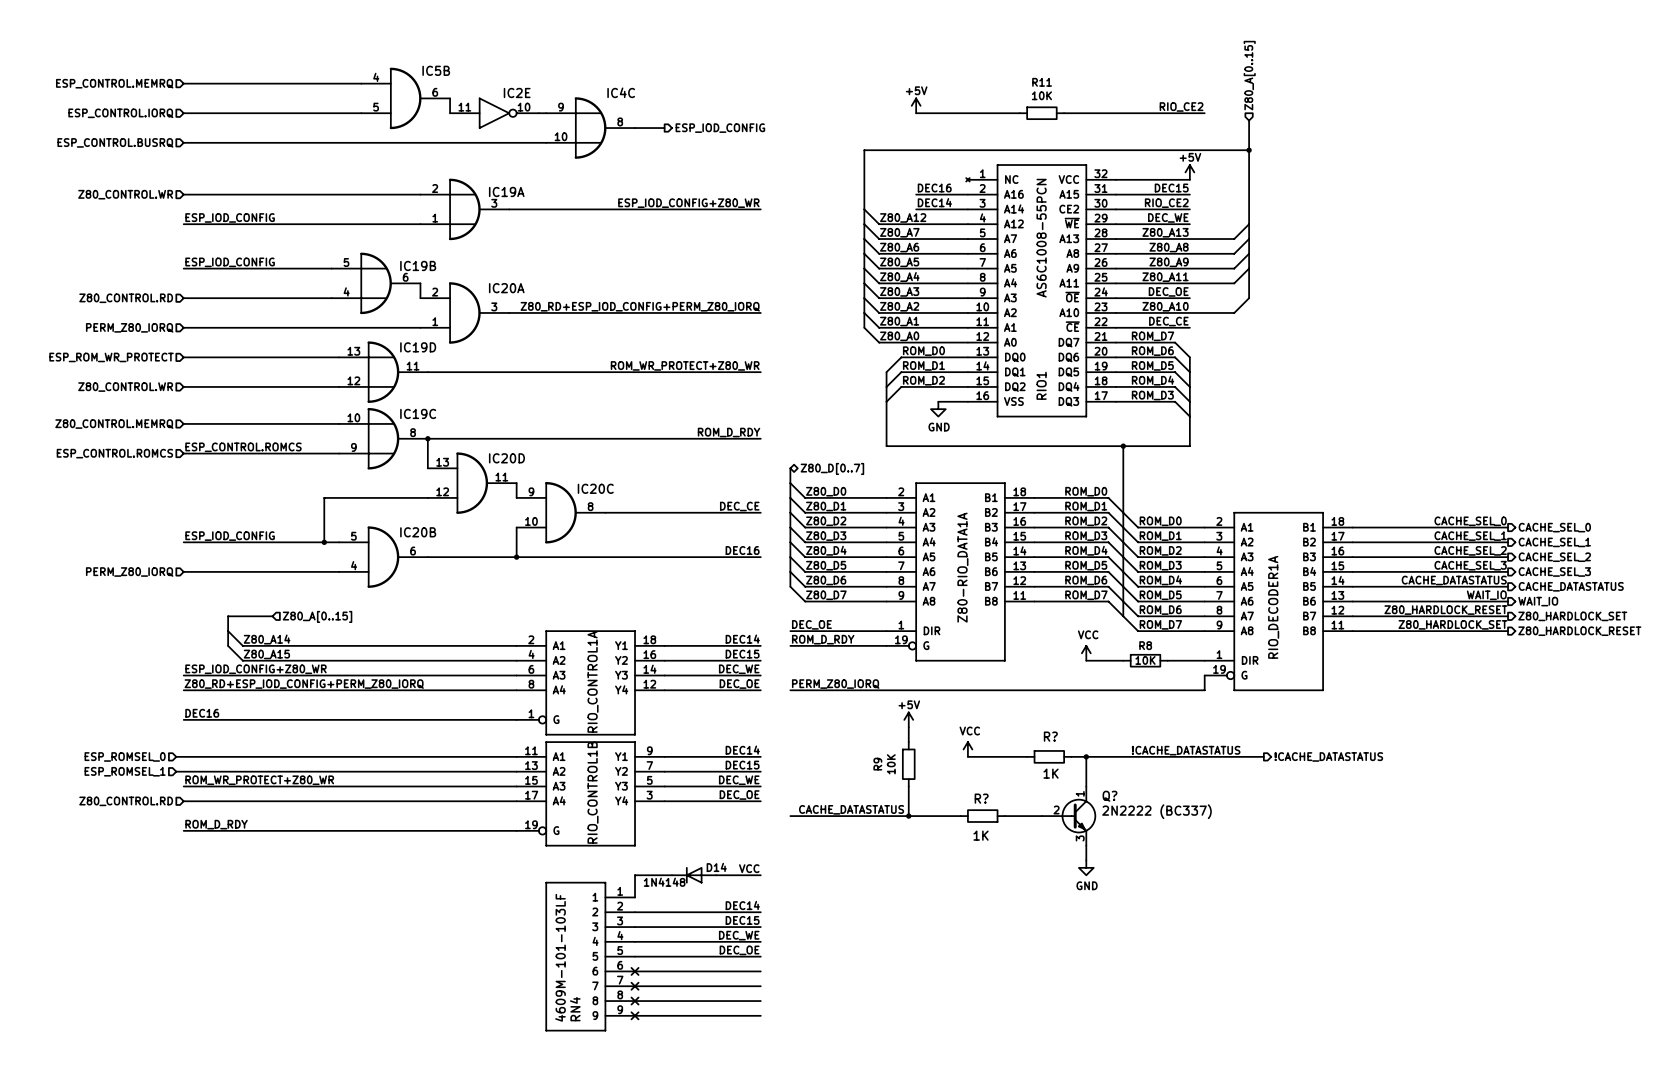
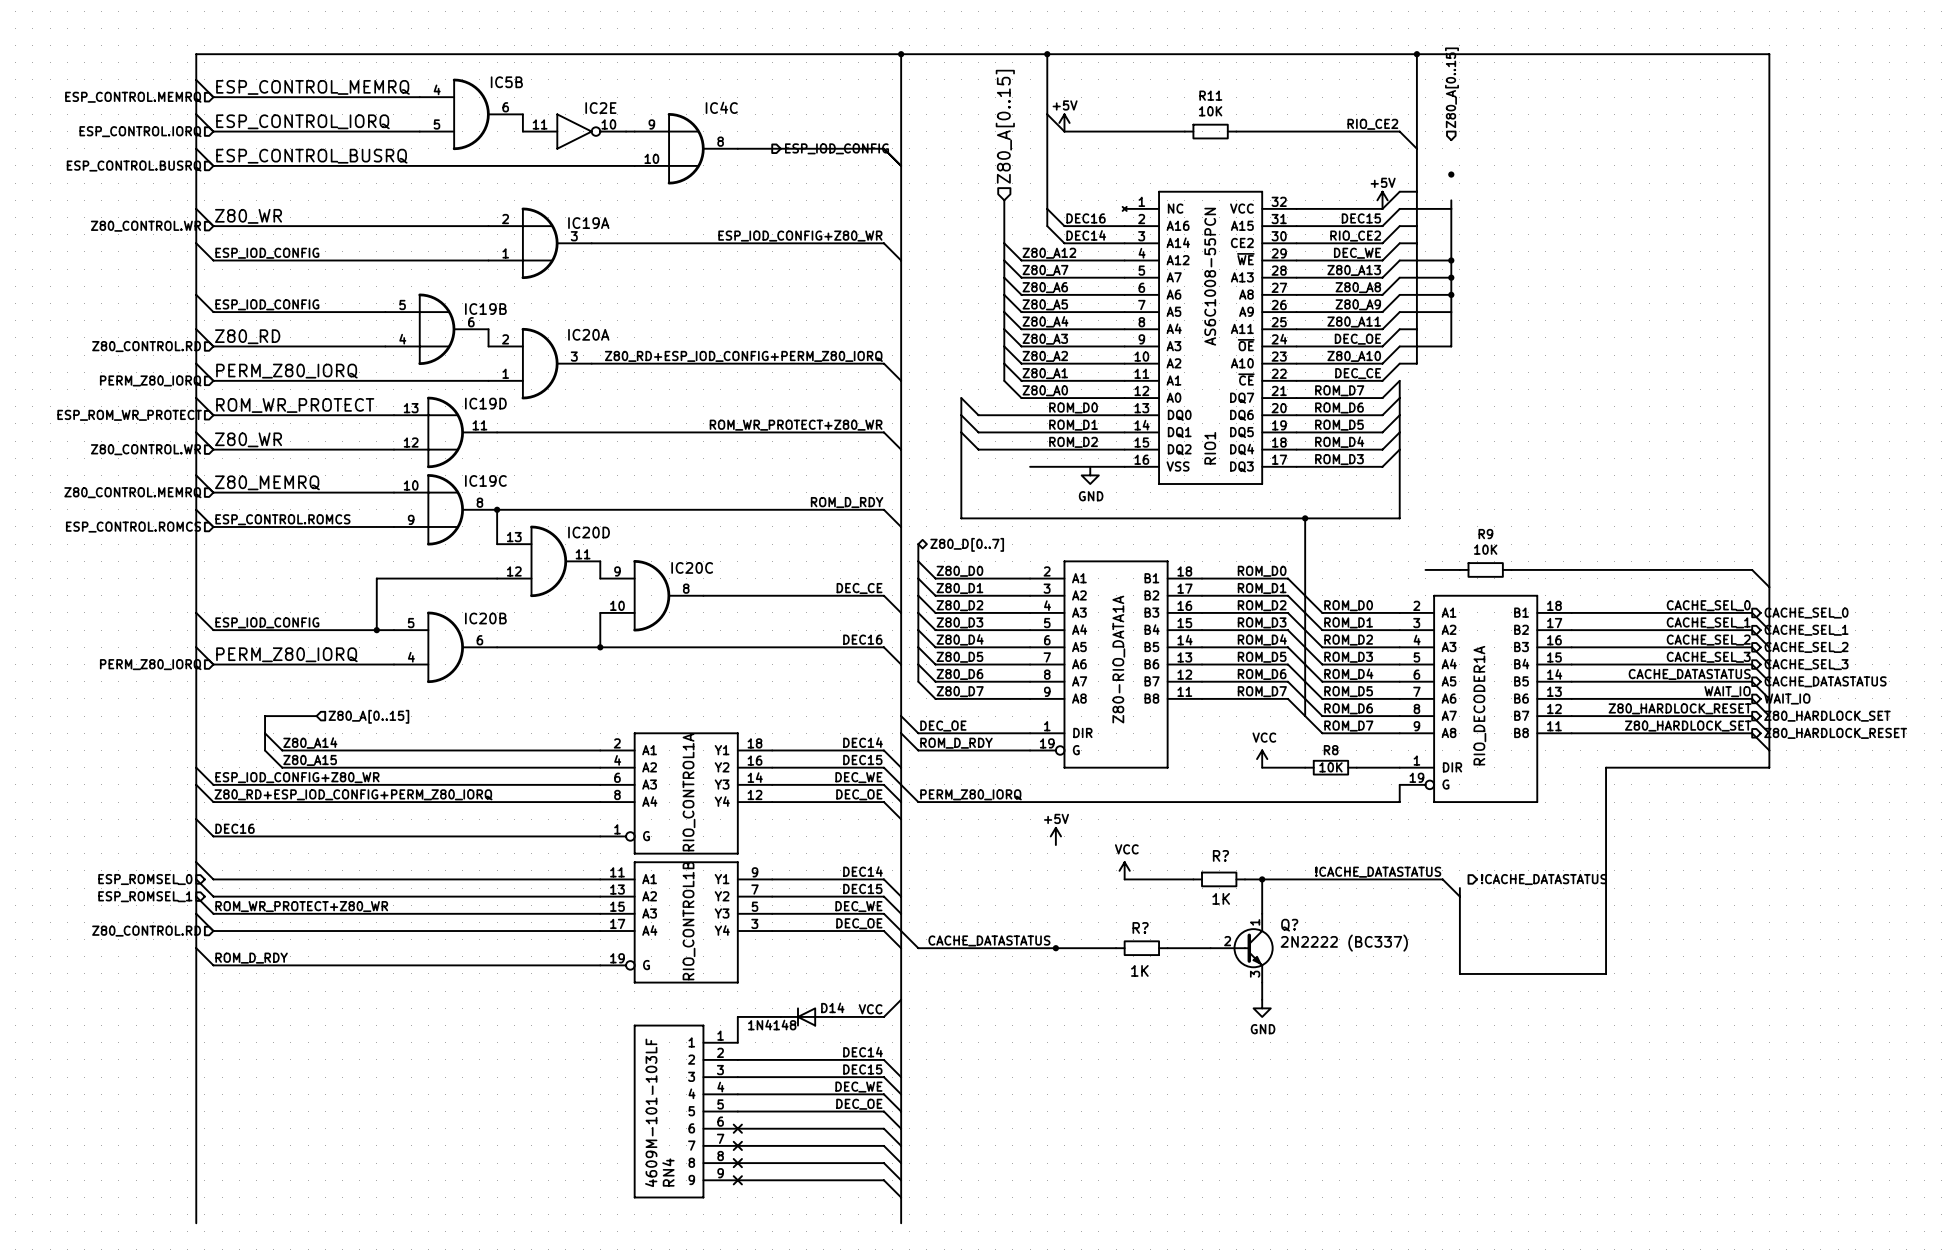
bus: none -> (901, 54) (901, 1223)
junction: none -> (901, 54)
bus: none -> (1047, 54) (1047, 226)
junction: none -> (1047, 54)
bus: none -> (1416, 54) (1416, 363) (1399, 363)
junction: none -> (1416, 54)
wire: none -> (196, 79) (213, 97)
label: none -> ESP_CONTROL_MEMRQ (312, 87)
wire: none -> (196, 114) (213, 131)
wire: none -> (1047, 114) (1064, 131)
label: none -> ESP_CONTROL_IORQ (302, 121)
hierarchical label: none -> Z80_A[0..15] (1005, 126)
wire: none -> (1399, 131) (1416, 148)
bus: (1249, 120) (1249, 172) -> none
wire: none -> (196, 148) (213, 165)
wire: none -> (772, 148) (883, 148) (901, 165)
label: none -> ESP_CONTROL_BUSRQ (311, 156)
bus: (1249, 150) (864, 150) (864, 172) -> none
wire: none -> (1399, 191) (1382, 208)
bus: none -> (1399, 191) (1416, 191)
wire: none -> (196, 208) (213, 226)
wire: none -> (1047, 208) (1064, 226)
wire: none -> (1399, 208) (1382, 226)
bus: none -> (1399, 208) (1451, 208)
label: none -> Z80_WR (248, 216)
wire: none -> (1047, 226) (1064, 243)
wire: none -> (1399, 226) (1382, 243)
bus: none -> (1399, 226) (1416, 226)
wire: none -> (196, 243) (213, 260)
wire: none -> (883, 243) (901, 260)
wire: none -> (1399, 243) (1382, 260)
bus: none -> (1399, 243) (1416, 243)
bus: none -> (1399, 260) (1451, 260)
wire: (1249, 224) (1234, 239) (1189, 239) -> (1399, 260) (1382, 277)
junction: none -> (1451, 260)
bus: none -> (1399, 277) (1451, 277)
wire: (1249, 239) (1234, 253) (1189, 253) -> (1399, 277) (1382, 294)
junction: none -> (1451, 277)
wire: none -> (196, 294) (213, 312)
bus: none -> (1399, 294) (1451, 294)
wire: (1249, 253) (1234, 268) (1189, 268) -> (1399, 294) (1382, 312)
junction: none -> (1451, 294)
bus: none -> (1399, 312) (1451, 312)
wire: (1249, 268) (1234, 283) (1189, 283) -> (1399, 312) (1382, 329)
wire: none -> (196, 329) (213, 346)
wire: none -> (1399, 329) (1382, 346)
bus: none -> (1399, 329) (1416, 329)
label: none -> Z80_RD (247, 336)
bus: none -> (1399, 346) (1451, 346)
wire: (1249, 298) (1234, 312) (1189, 312) -> (1399, 346) (1382, 363)
wire: none -> (196, 363) (213, 380)
wire: none -> (883, 363) (901, 380)
wire: none -> (1399, 363) (1382, 380)
label: none -> PERM_Z80_IORQ (286, 371)
wire: none -> (196, 398) (213, 415)
wire: (1175, 342) (1189, 357) -> (1365, 398) (1382, 398) (1399, 380)
label: none -> ROM_WR_PROTECT (295, 405)
wire: (901, 357) (886, 372) -> (1047, 415) (978, 415) (961, 398)
wire: (1175, 357) (1189, 372) -> (1365, 415) (1382, 415) (1399, 398)
bus: (1189, 357) (1189, 446) -> (1399, 380) (1399, 518) (1382, 518)
wire: none -> (196, 432) (213, 449)
wire: none -> (883, 432) (901, 449)
wire: none -> (961, 432) (978, 449) (1047, 449)
bus: (886, 372) (886, 446) -> (961, 398) (961, 518) (1030, 518)
wire: (901, 372) (886, 386) -> (1047, 432) (978, 432) (961, 415)
wire: (1175, 372) (1189, 386) -> (1365, 432) (1382, 432) (1399, 415)
label: none -> Z80_WR (248, 439)
wire: (901, 386) (886, 401) -> (1090, 466) (1030, 466)
wire: (1175, 386) (1189, 401) -> (1365, 449) (1382, 449) (1399, 432)
wire: (1175, 401) (1189, 416) -> (1365, 466) (1382, 466) (1399, 449)
wire: none -> (196, 475) (213, 492)
label: none -> Z80_MEMRQ (267, 482)
wire: none -> (196, 509) (213, 526)
wire: none -> (883, 509) (901, 526)
wire: none -> (1425, 569) (1459, 569)
wire: none -> (1511, 569) (1752, 569) (1769, 587)
wire: none -> (883, 595) (901, 612)
wire: none -> (196, 612) (213, 630)
wire: none -> (1752, 612) (1769, 630)
wire: none -> (1752, 630) (1769, 647)
wire: none -> (196, 647) (213, 664)
wire: none -> (883, 647) (901, 664)
wire: none -> (1752, 647) (1769, 664)
label: none -> PERM_Z80_IORQ (286, 654)
wire: none -> (1752, 664) (1769, 681)
wire: none -> (1752, 681) (1769, 698)
wire: none -> (1752, 698) (1769, 716)
wire: none -> (901, 716) (918, 733)
wire: none -> (1752, 716) (1769, 733)
wire: none -> (901, 733) (918, 750)
wire: none -> (1752, 733) (1769, 750)
wire: none -> (883, 750) (901, 767)
wire: none -> (196, 767) (213, 784)
wire: none -> (883, 767) (918, 802)
wire: none -> (196, 784) (213, 802)
wire: none -> (883, 784) (901, 802)
wire: none -> (883, 802) (901, 819)
wire: none -> (196, 819) (213, 836)
wire: (908, 727) (908, 742) -> none
wire: (176, 756) (183, 756) -> (196, 862) (213, 879)
wire: none -> (883, 879) (901, 896)
wire: (1241, 756) (1263, 756) -> (1442, 879) (1459, 896)
R9 rotation: 0° (908, 764) -> 90° clockwise (1485, 569)
R9 position: (908, 764) -> (1485, 569)
bus: none -> (1459, 888) (1459, 973) (1606, 973) (1606, 767) (1769, 767) (1769, 54) (196, 54) (196, 1223)
wire: none -> (196, 896) (213, 913)
wire: (176, 771) (183, 771) -> (196, 879) (213, 896)
wire: none -> (883, 896) (901, 913)
wire: none -> (196, 913) (213, 931)
wire: none -> (883, 913) (918, 948)
wire: (908, 786) (908, 816) -> none
wire: none -> (883, 931) (901, 948)
wire: none -> (196, 948) (213, 965)
wire: none -> (901, 999) (883, 1016)
wire: none -> (883, 1059) (901, 1077)
wire: none -> (883, 1077) (901, 1094)
wire: none -> (883, 1094) (901, 1111)
wire: none -> (883, 1111) (901, 1128)
wire: none -> (883, 1128) (901, 1145)
wire: none -> (883, 1145) (901, 1163)
wire: none -> (883, 1163) (901, 1180)
wire: none -> (883, 1180) (901, 1197)

